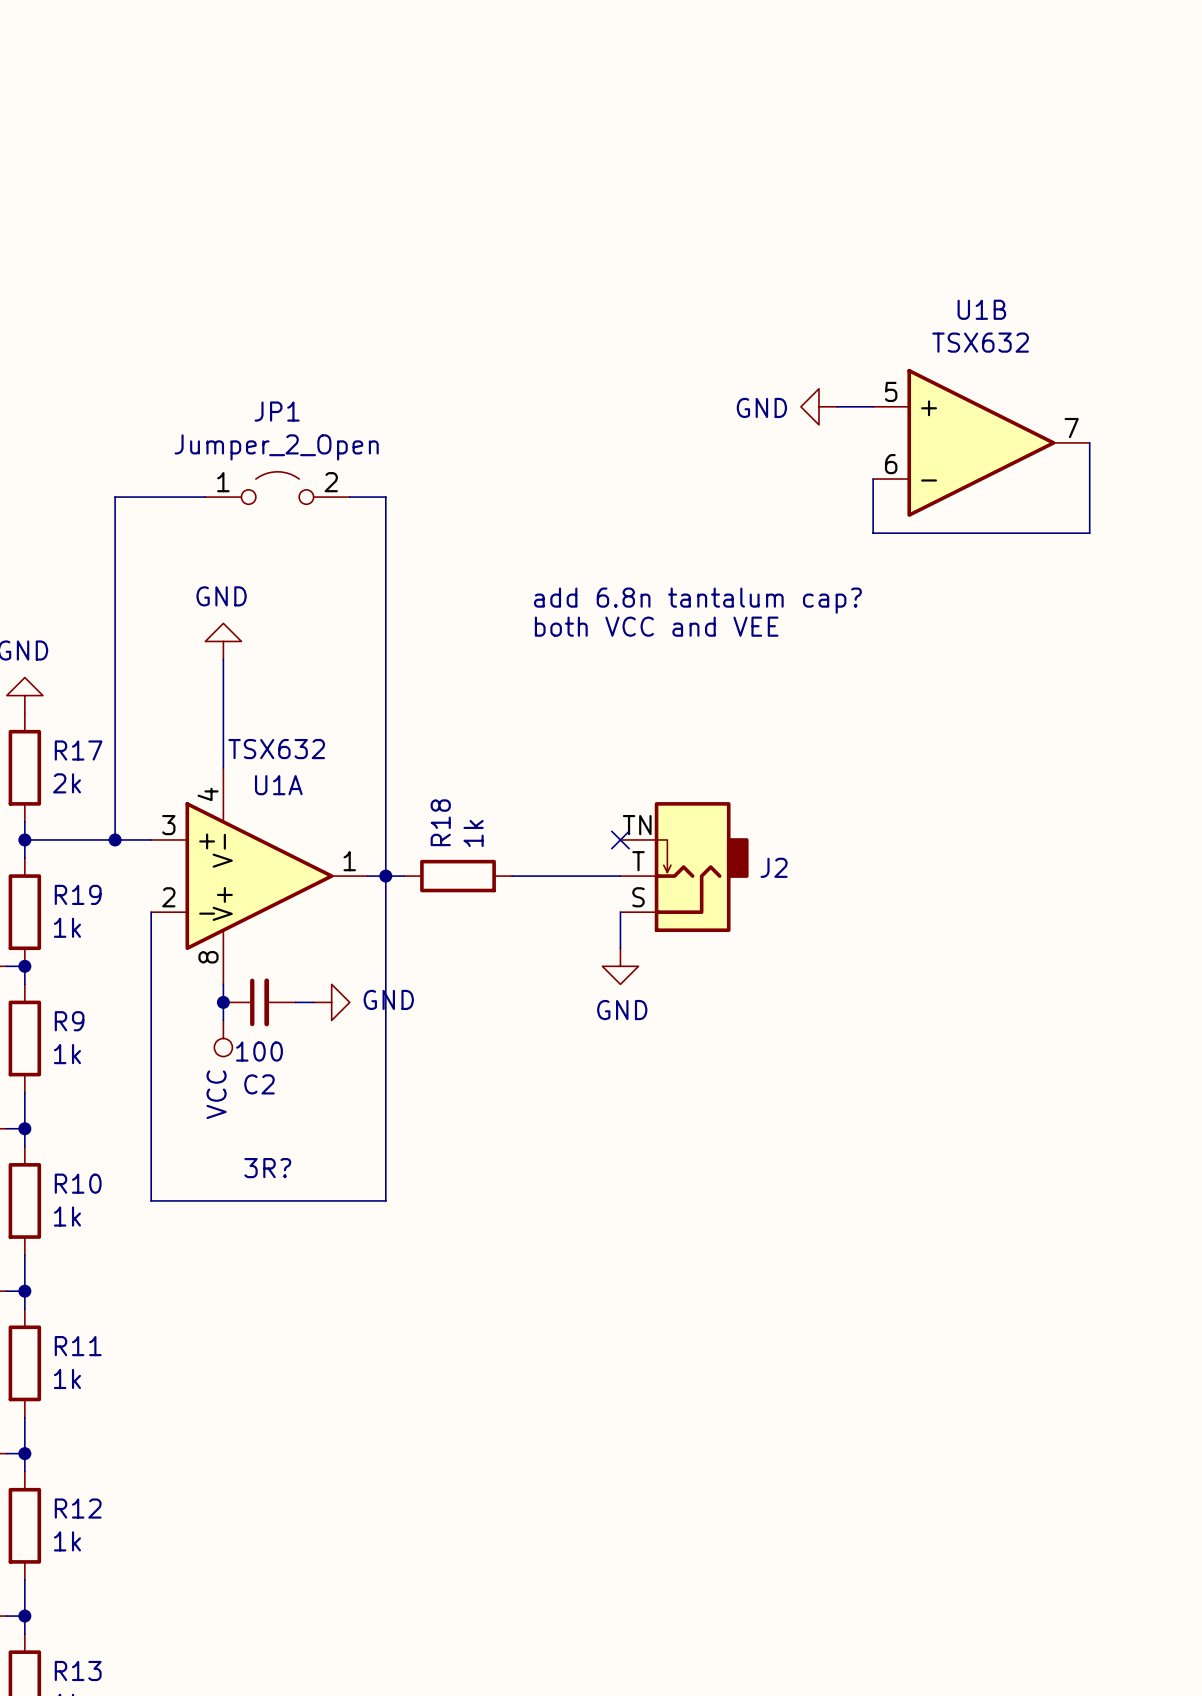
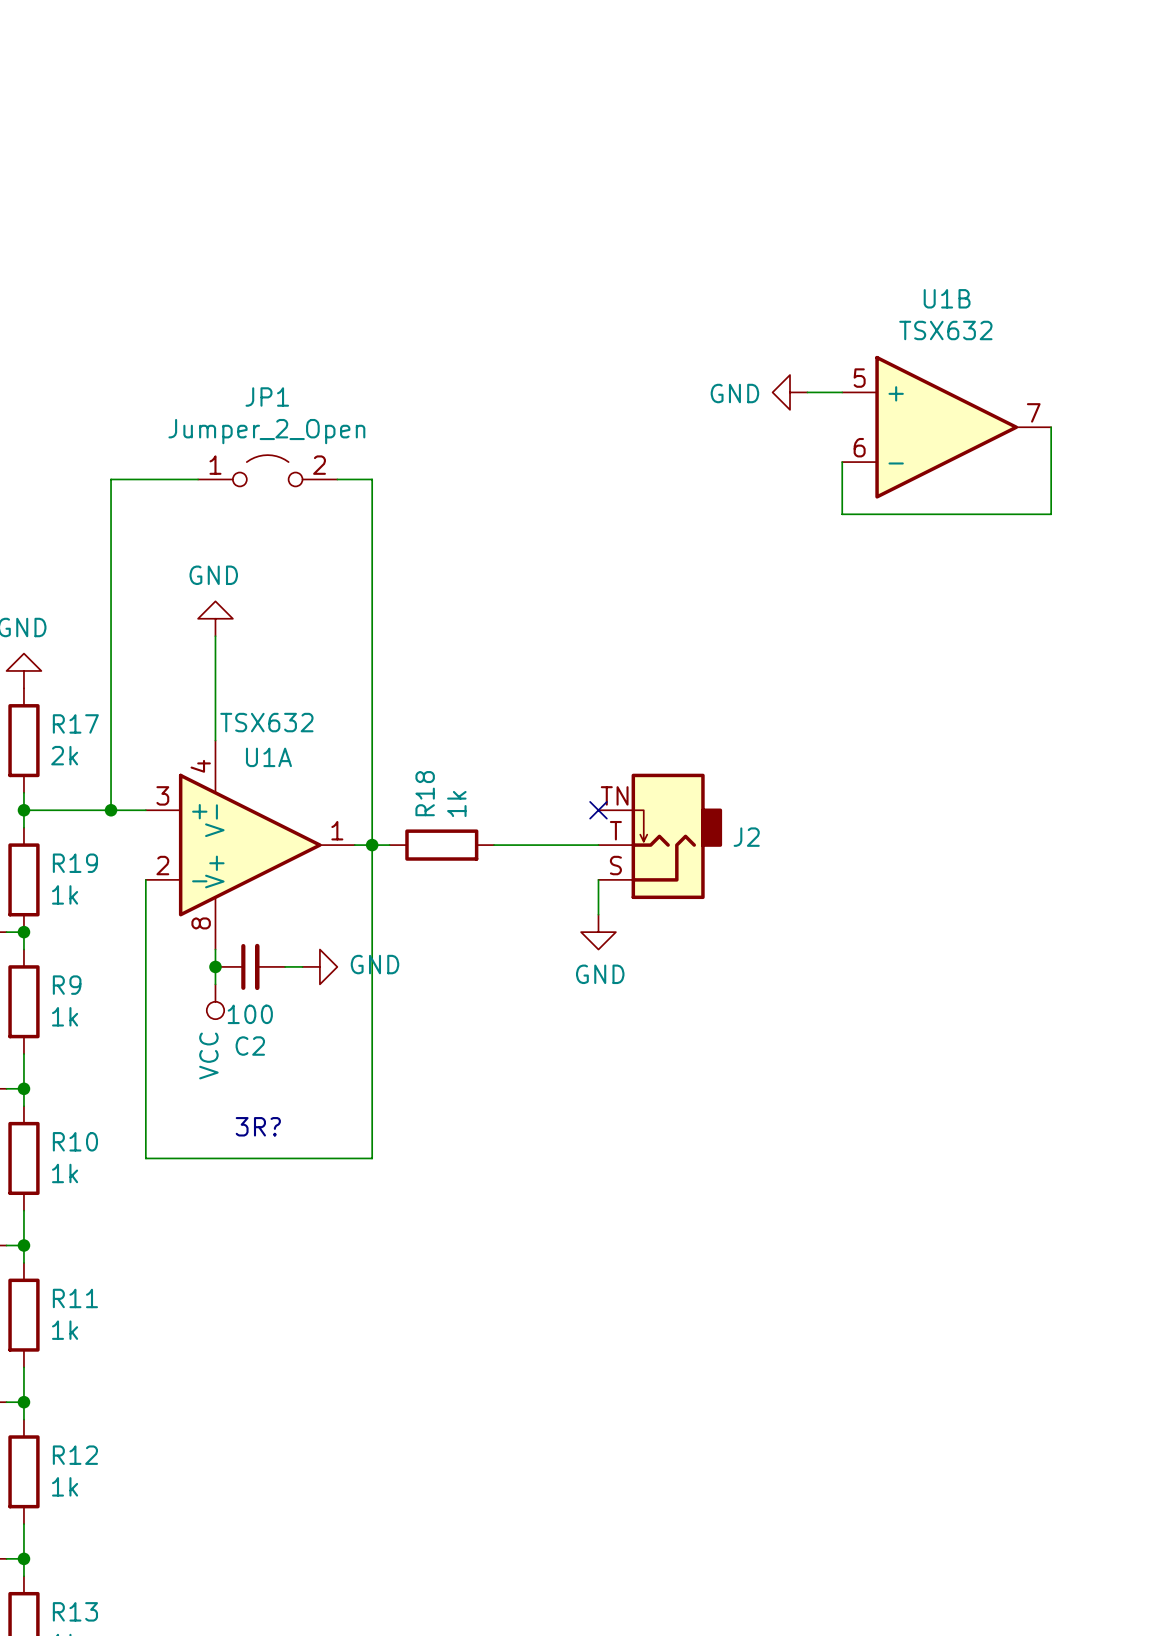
text: add 6.8n tantalum cap? (697, 600) -> none
text: both VCC and VEE (656, 626) -> none

